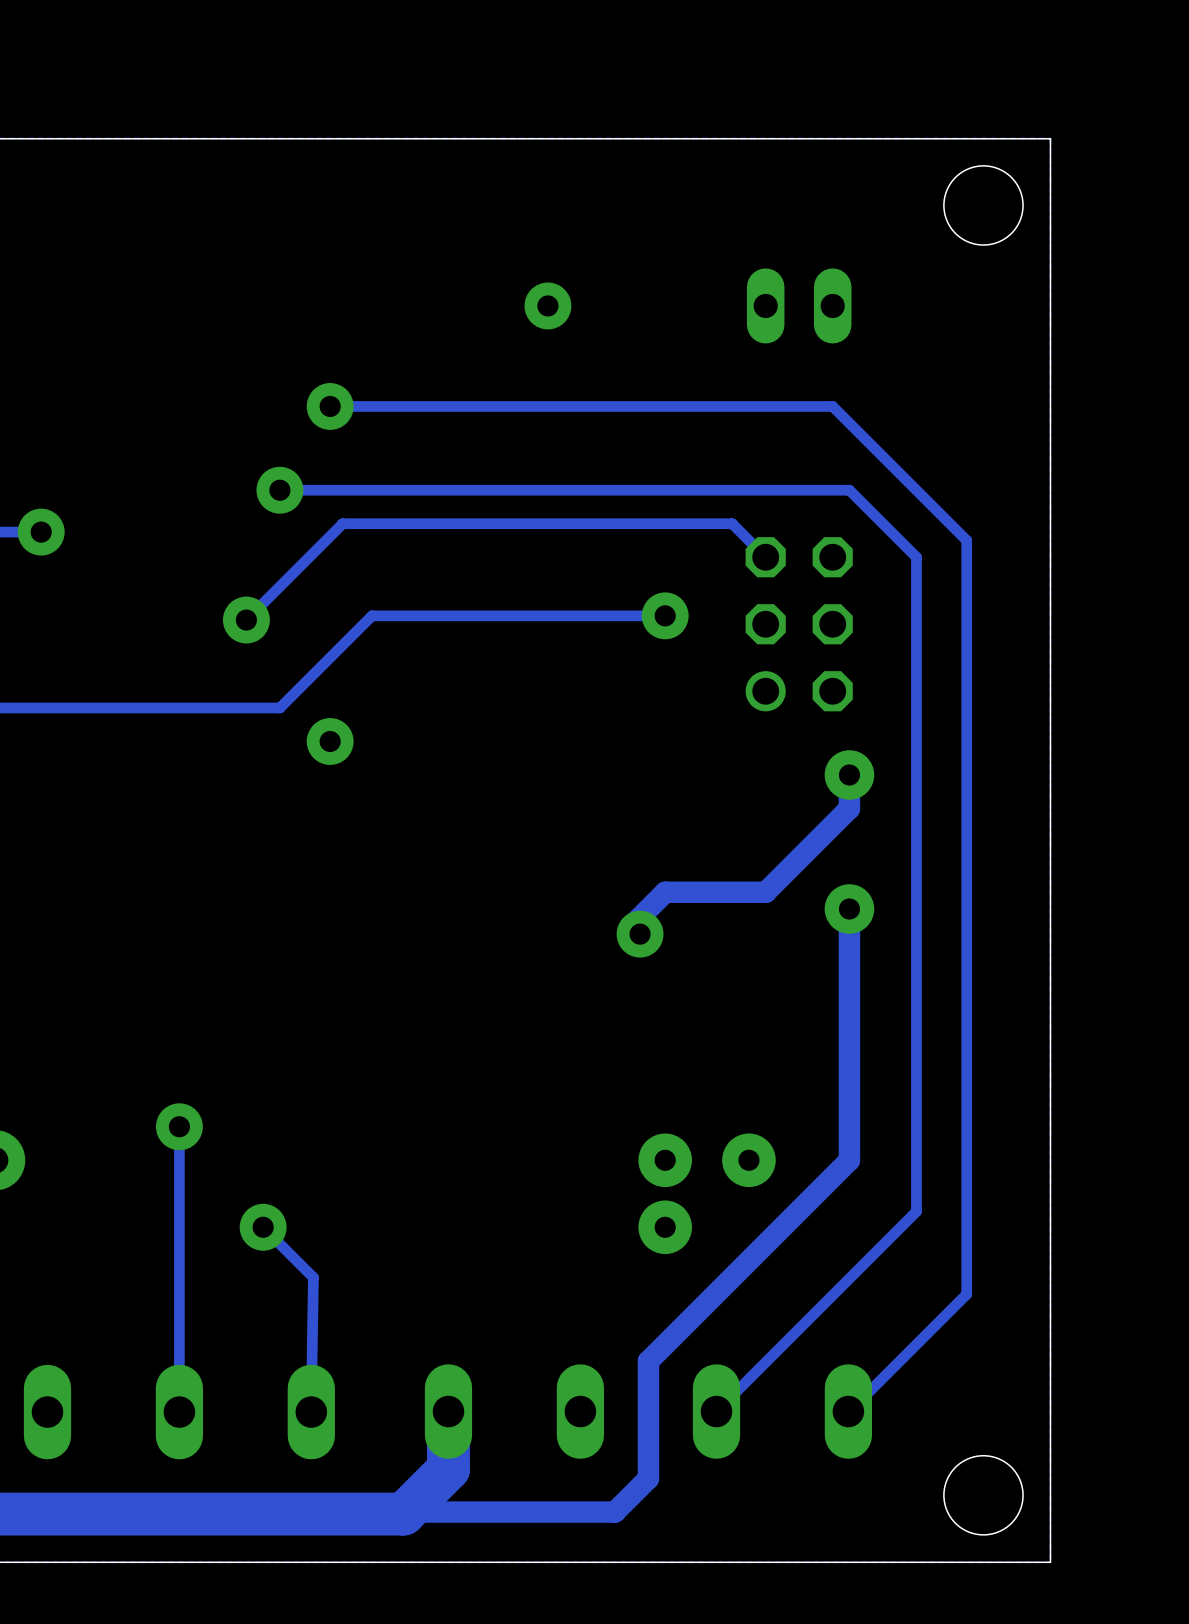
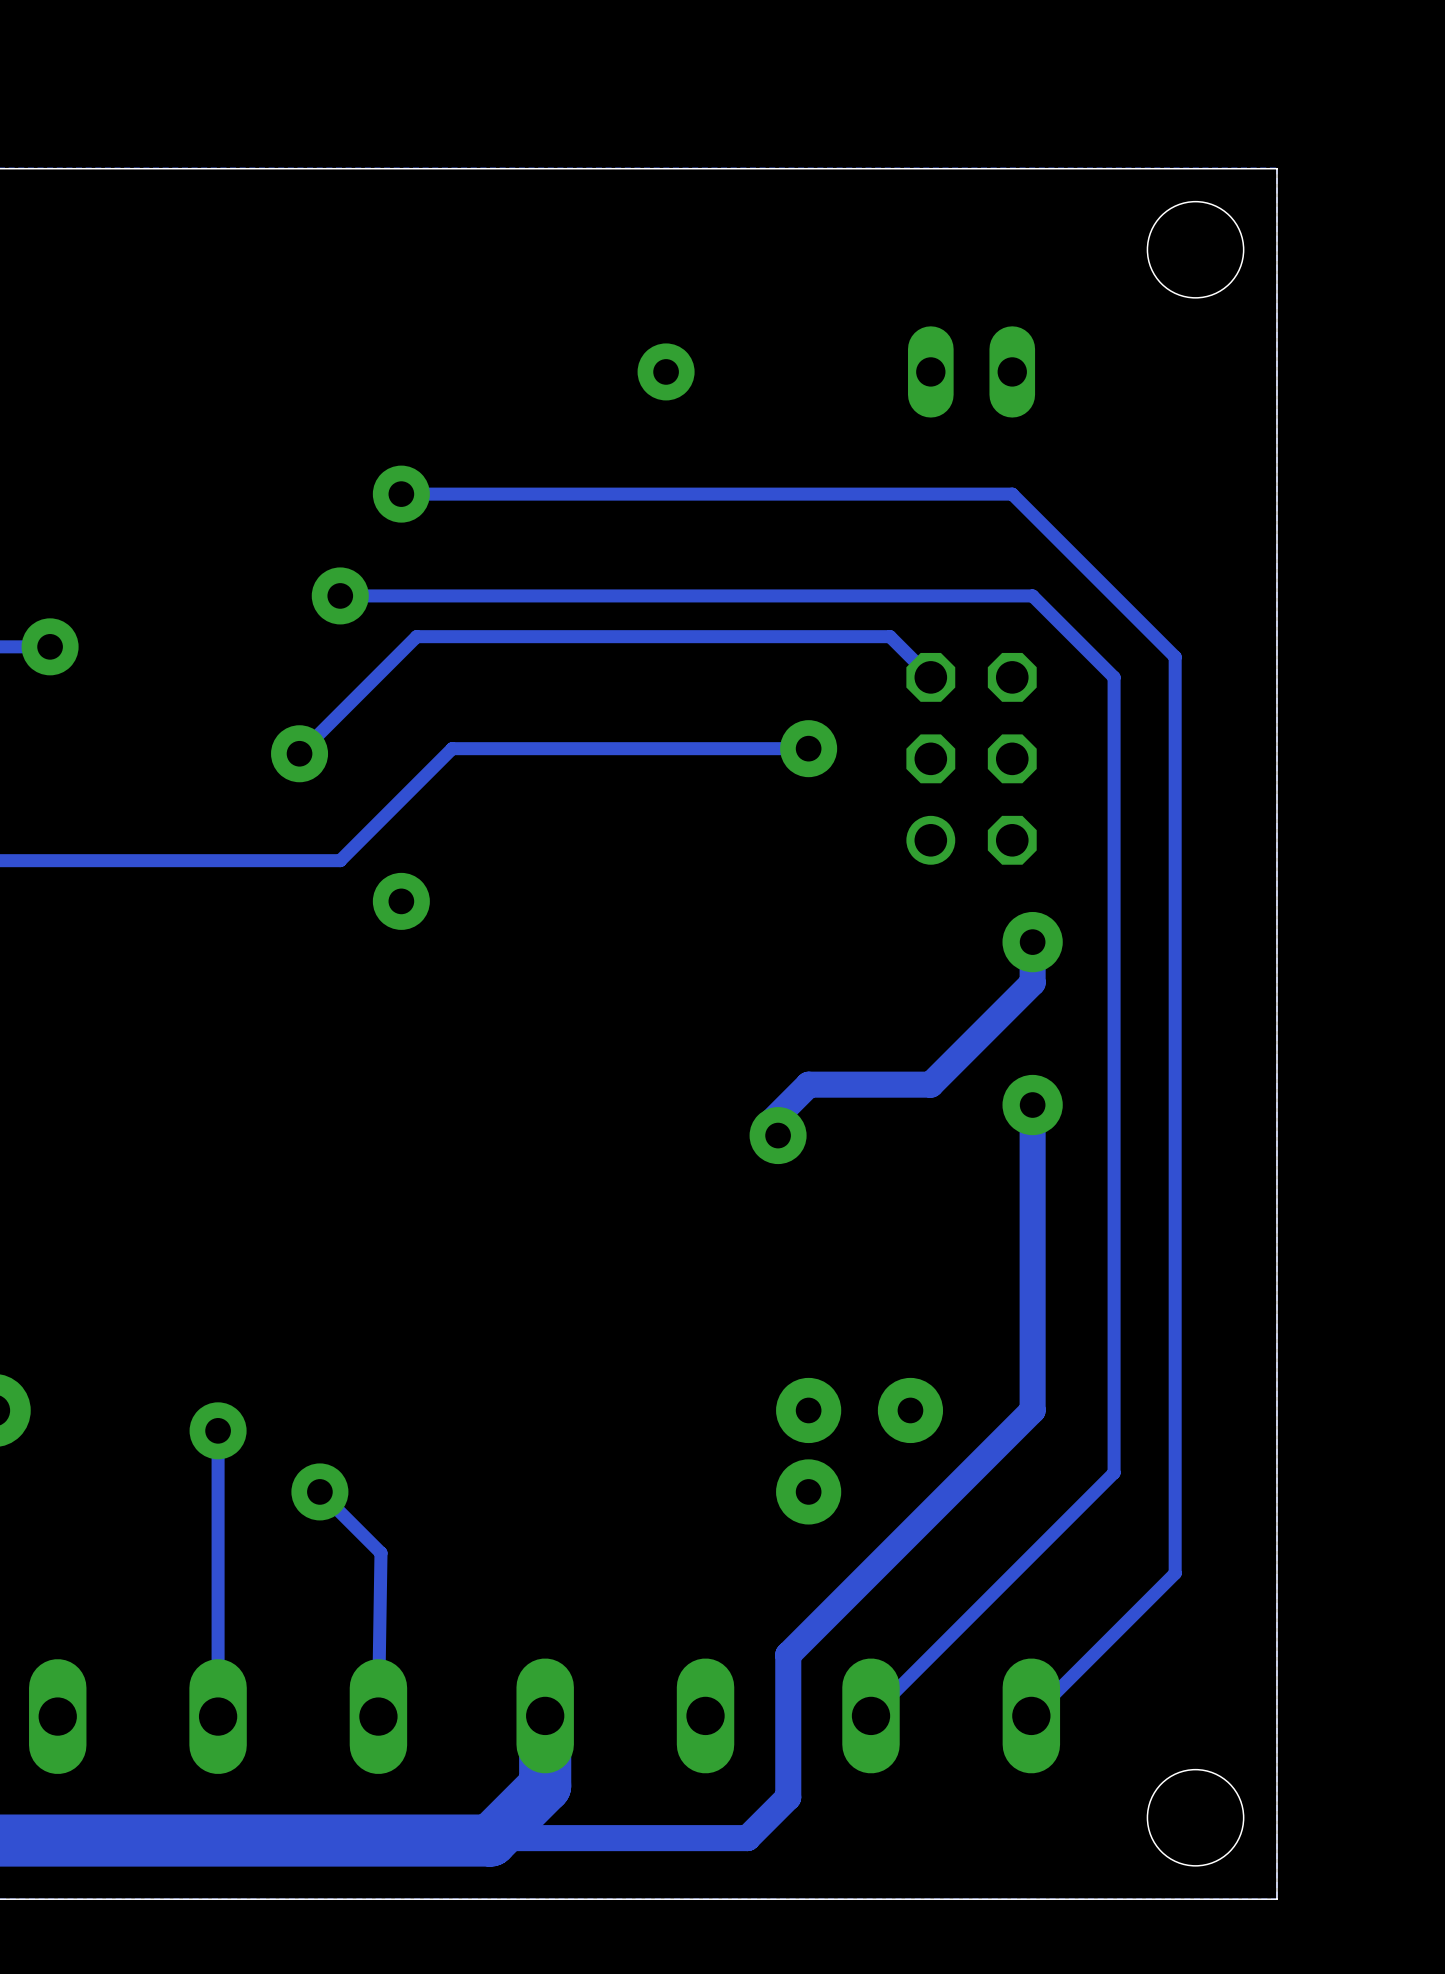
track: (179, 1126) (179, 1177) -> none
via position: (179, 1126) -> (218, 1430)

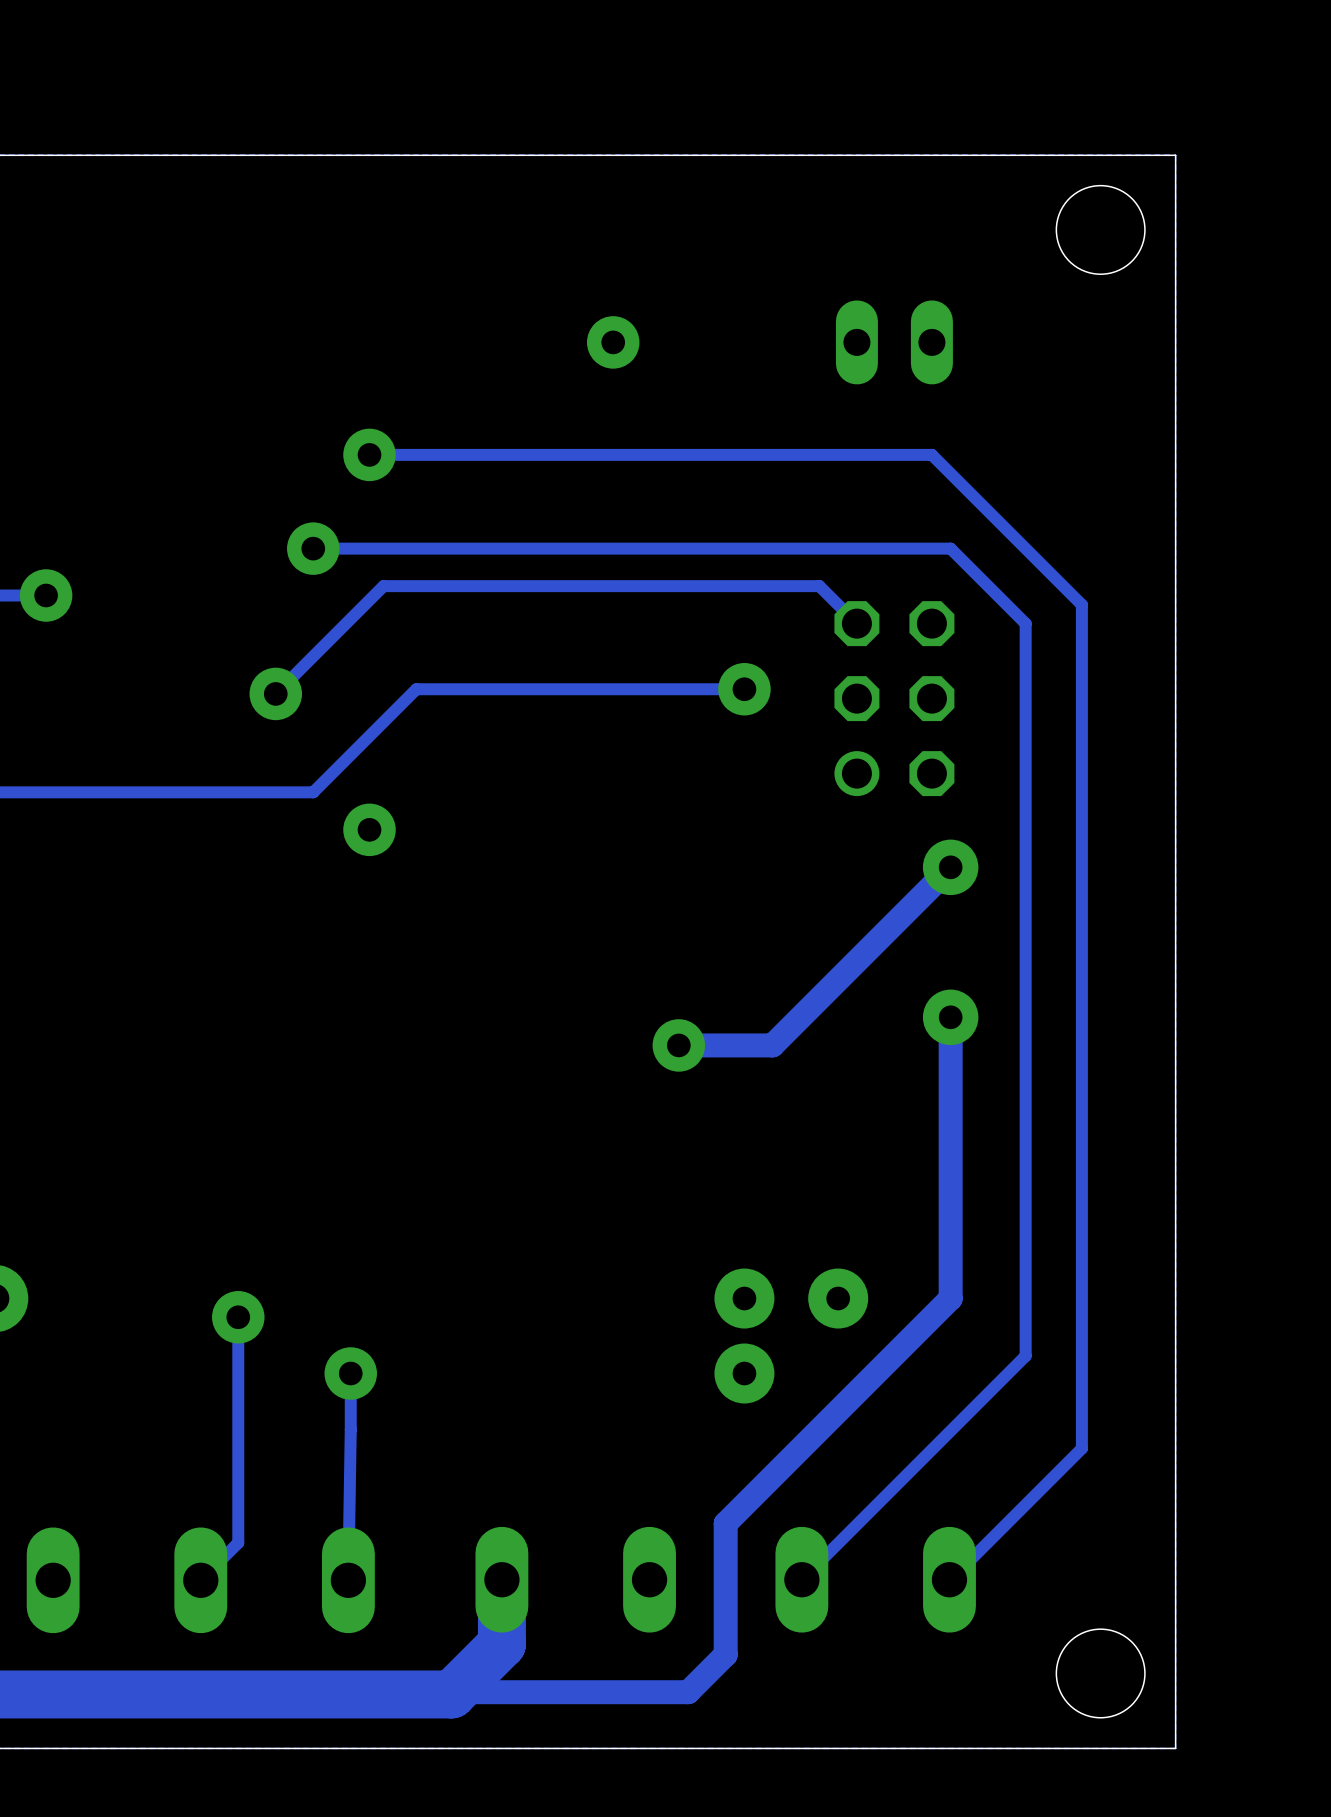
track: (1032, 942) (1032, 982) (930, 1084) (808, 1084) (767, 1125) (778, 1135) -> (950, 867) (772, 1045) (678, 1045)
via position: (778, 1135) -> (678, 1045)
track: (218, 1430) (218, 1716) -> (238, 1317) (238, 1542) (200, 1580)
via position: (218, 1430) -> (238, 1317)
track: (319, 1491) (381, 1553) -> (350, 1373) (350, 1429)
via: (319, 1491) -> none
via: none -> (350, 1373)

